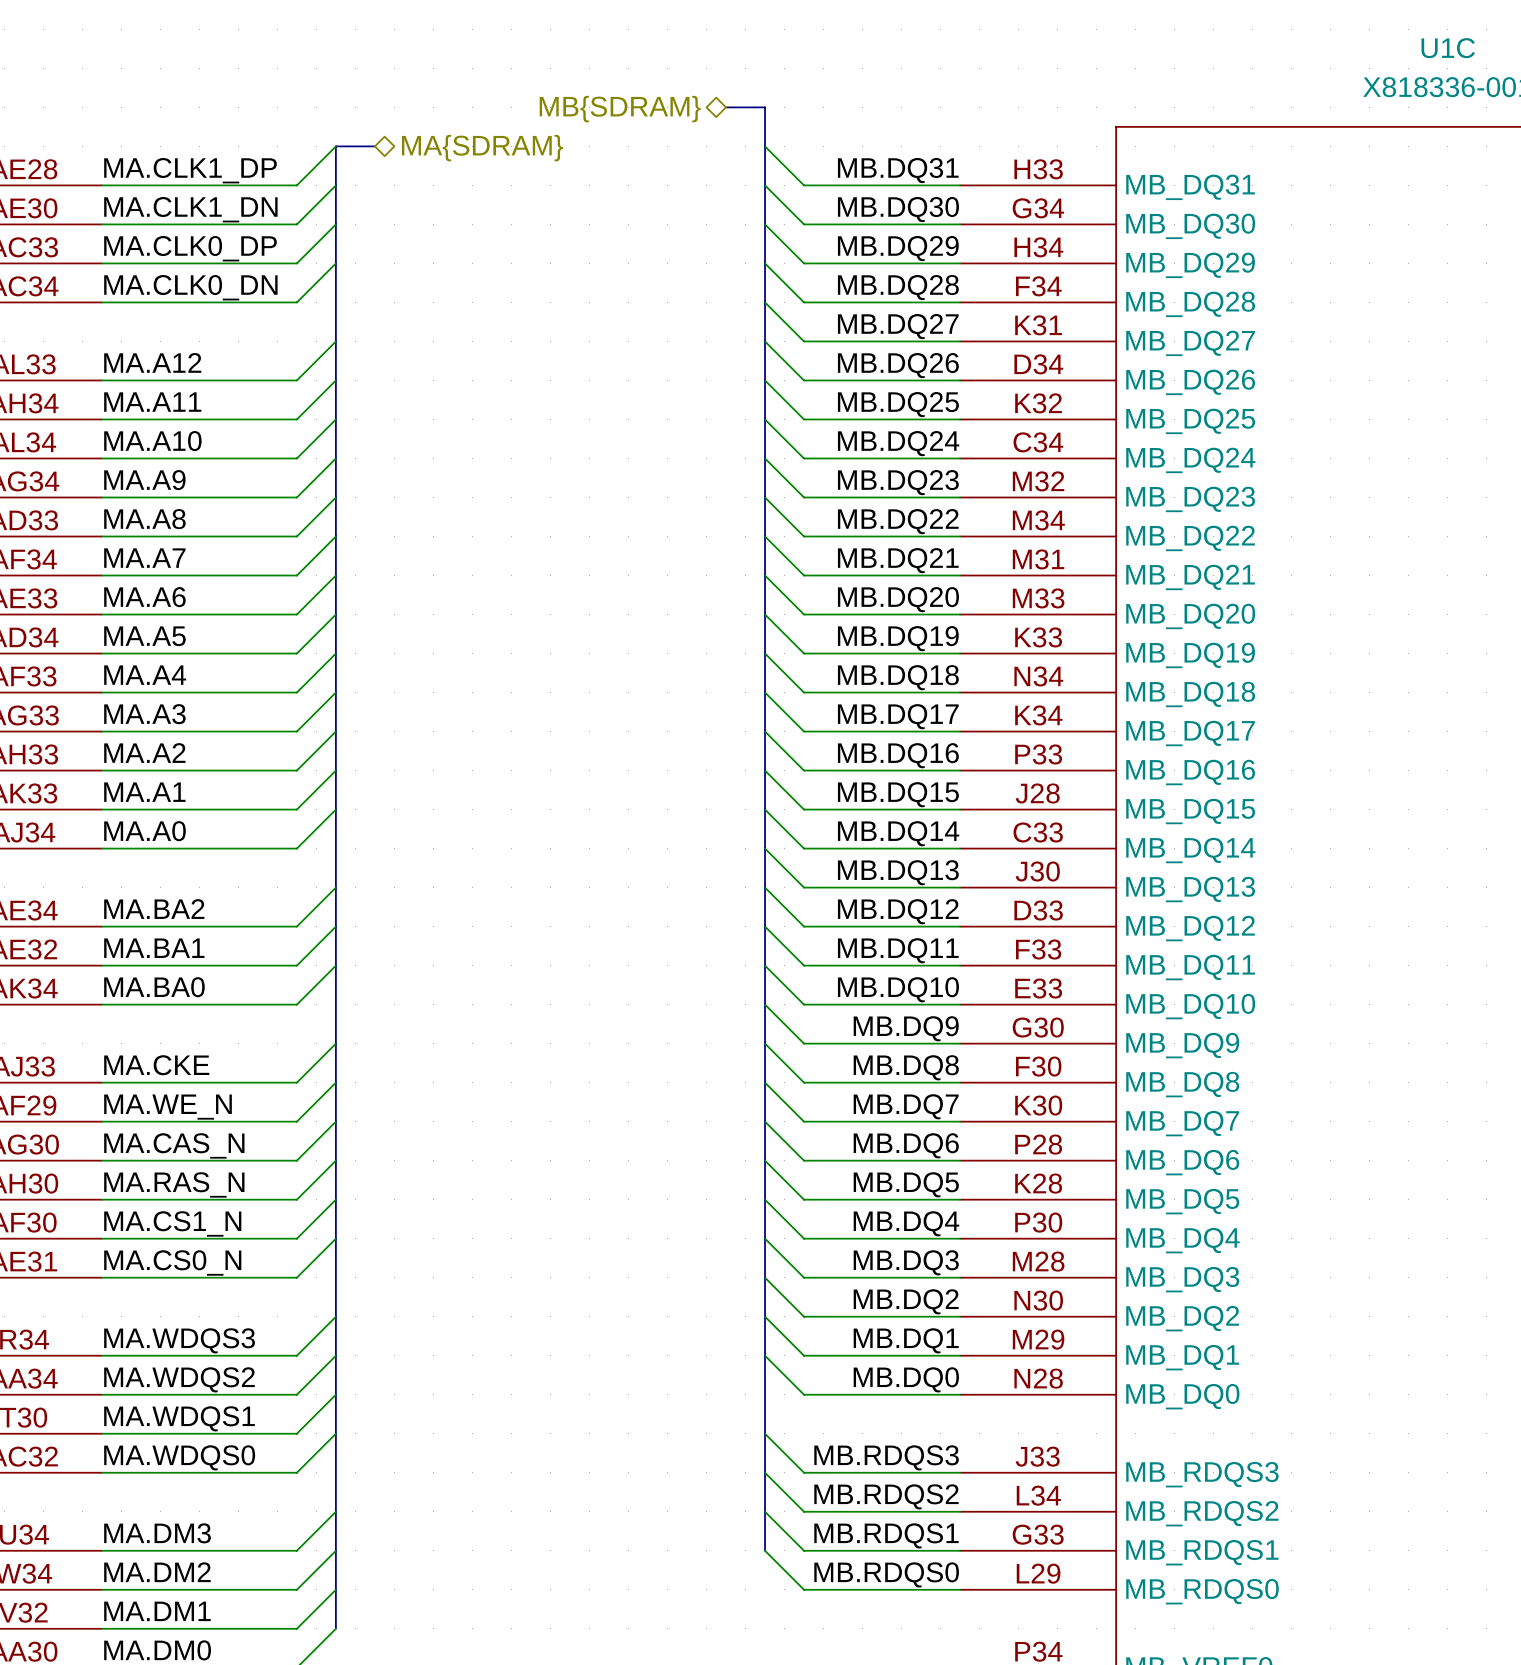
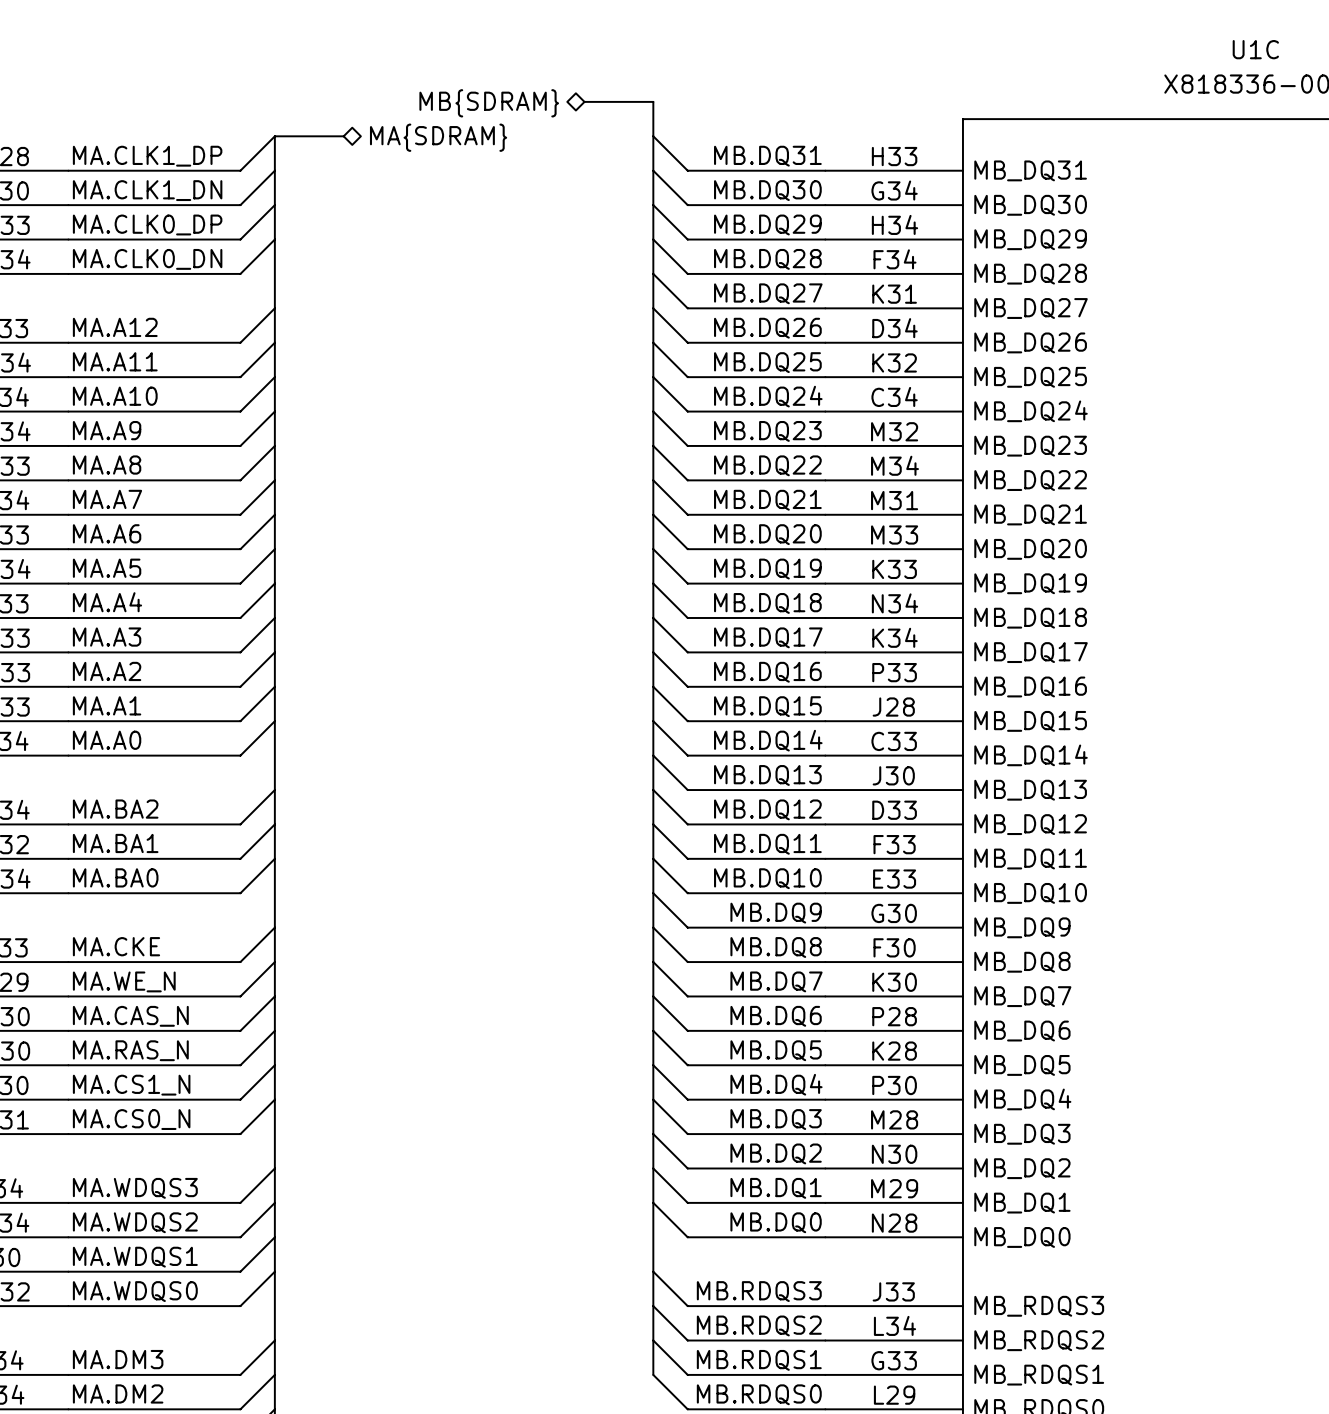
bus: none -> (584, 101) (618, 101)
hierarchical label position: MB{SDRAM} (620, 109) -> MB{SDRAM} (489, 103)
bus: none -> (309, 136) (343, 136)
hierarchical label position: MA{SDRAM} (482, 148) -> MA{SDRAM} (438, 137)

